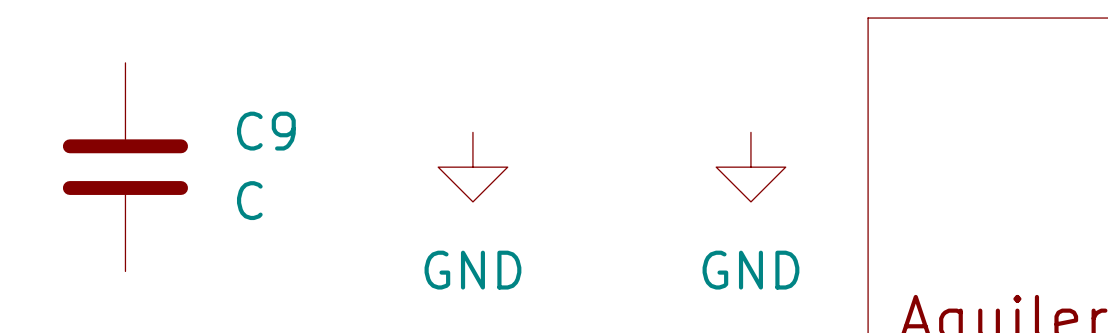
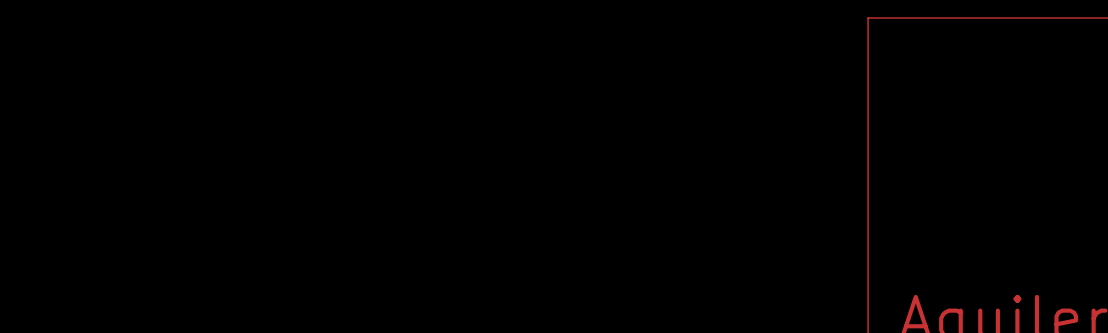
C9: C (125, 167) -> none
power symbol: GND (472, 167) -> none
power symbol: GND (750, 167) -> none

